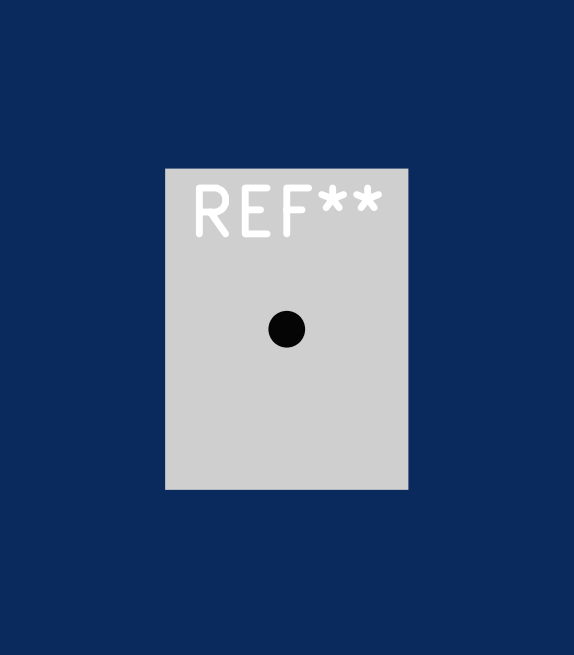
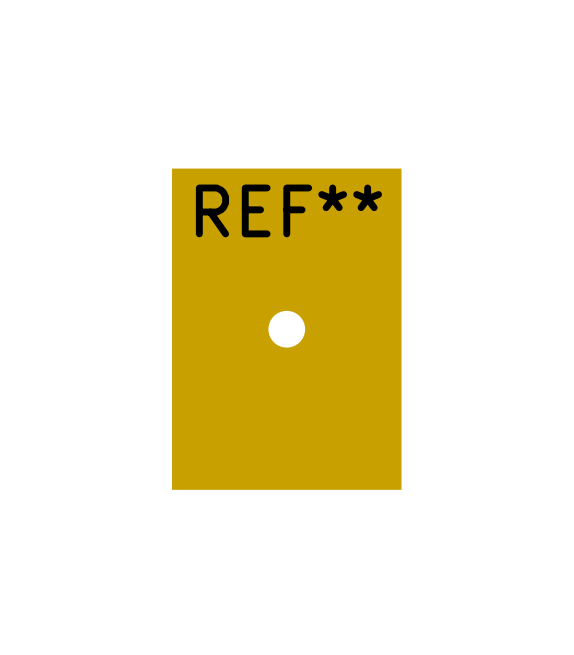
REF** footprint: [165, 168, 409, 490] -> [172, 168, 402, 490]

